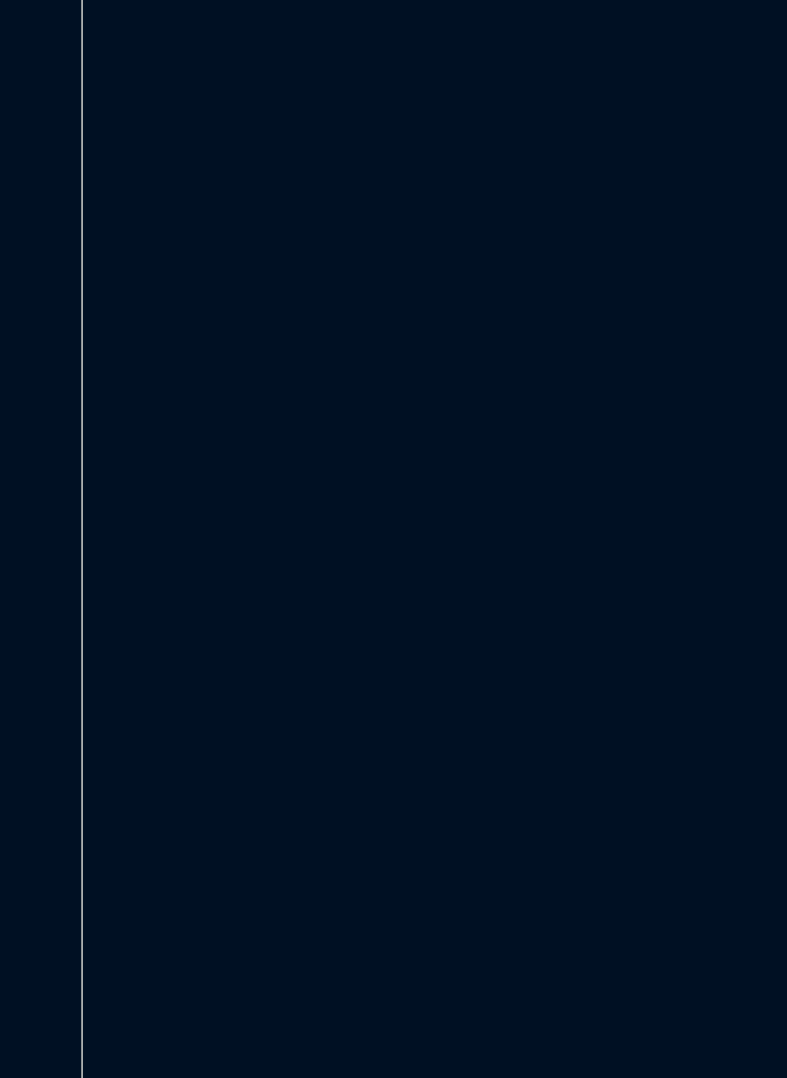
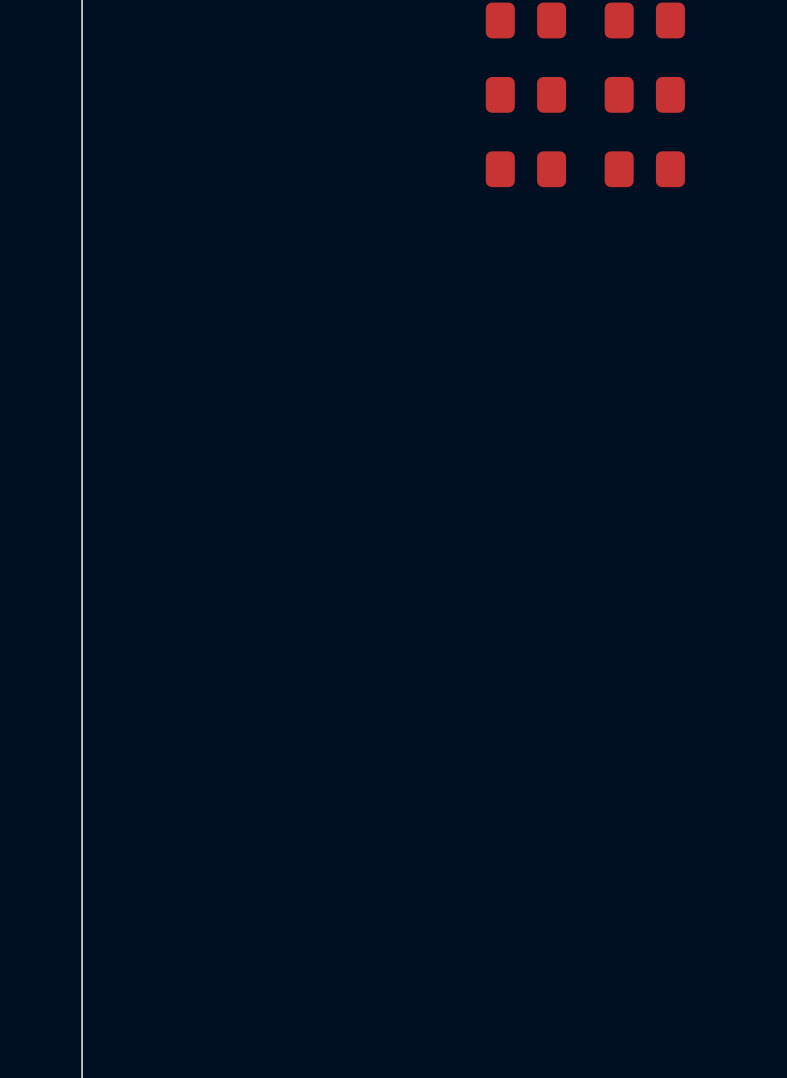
part: none -> (525, 20)
part: none -> (644, 20)
part: none -> (525, 94)
part: none -> (644, 94)
part: none -> (525, 169)
part: none -> (644, 169)

